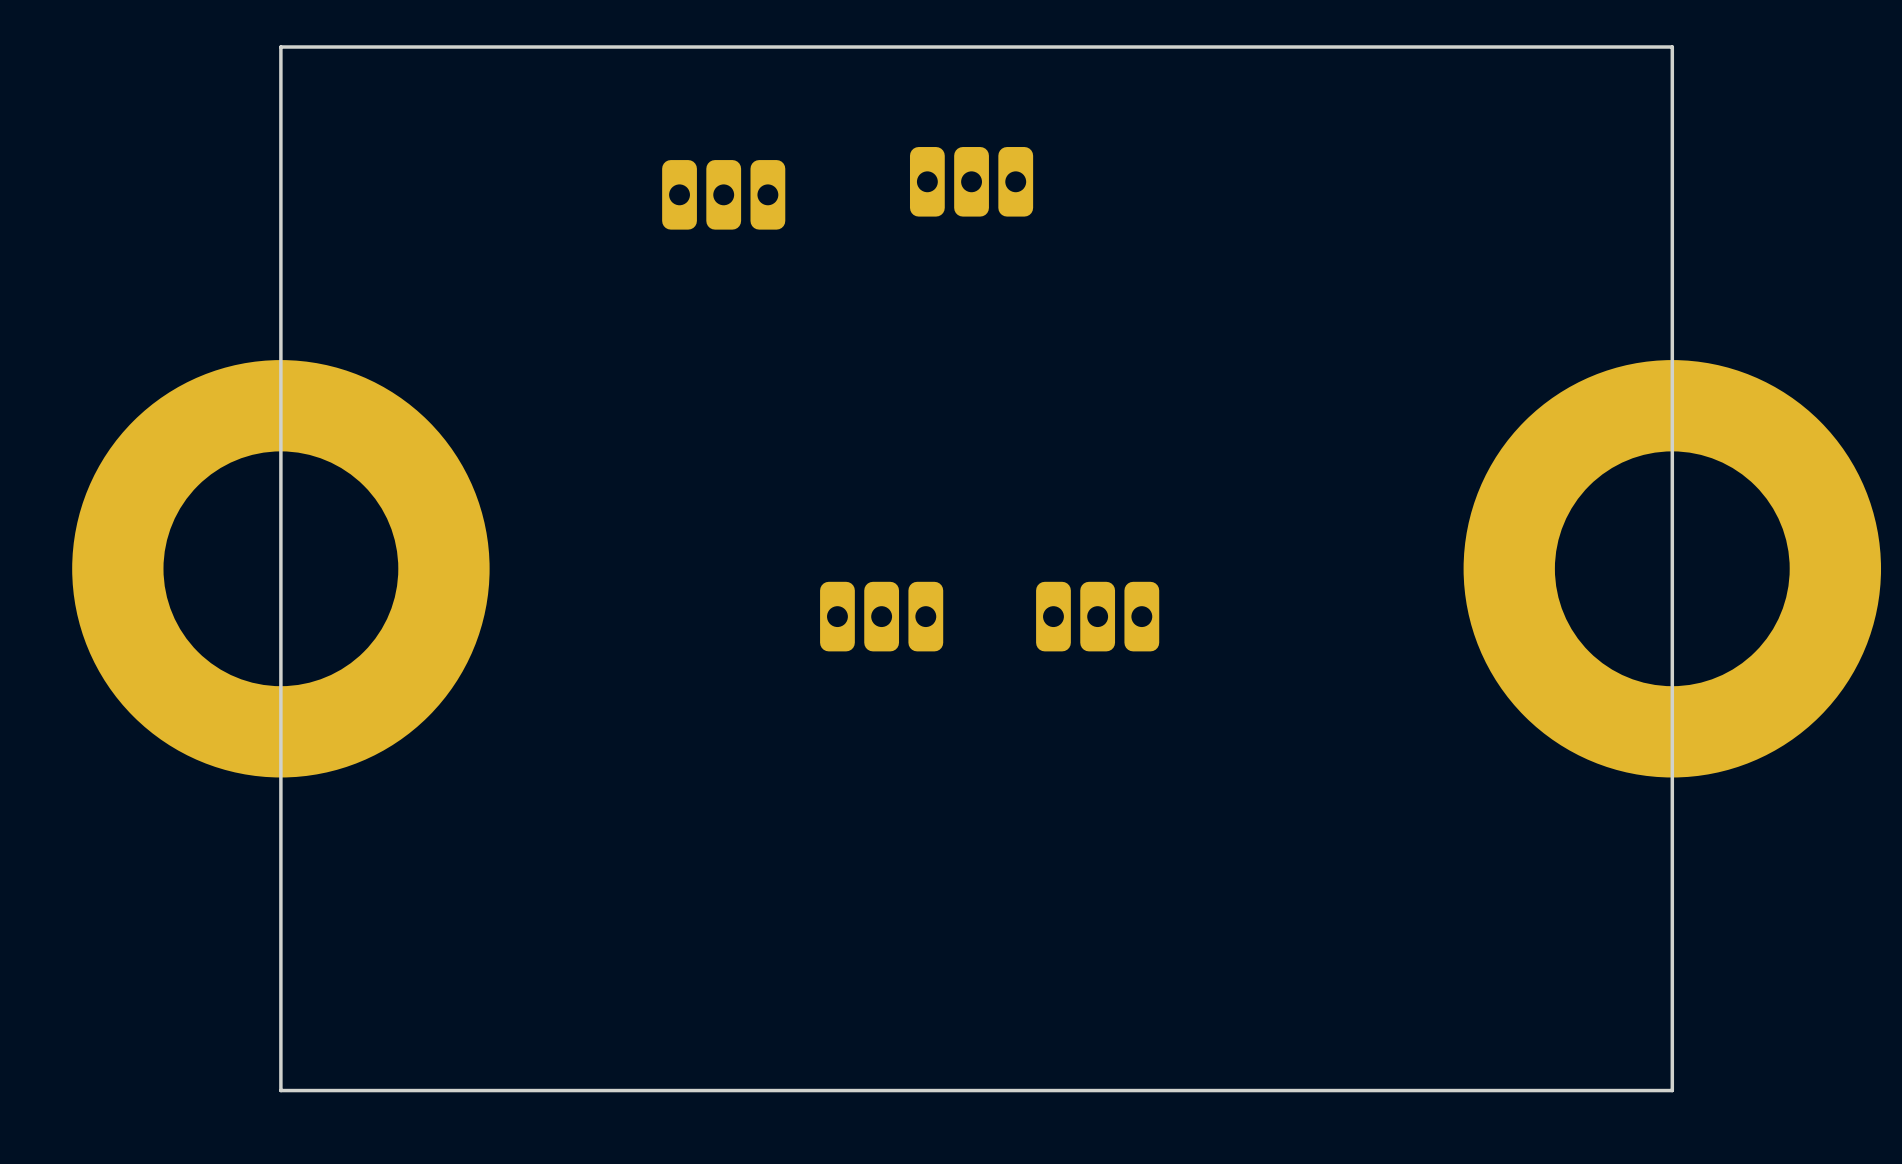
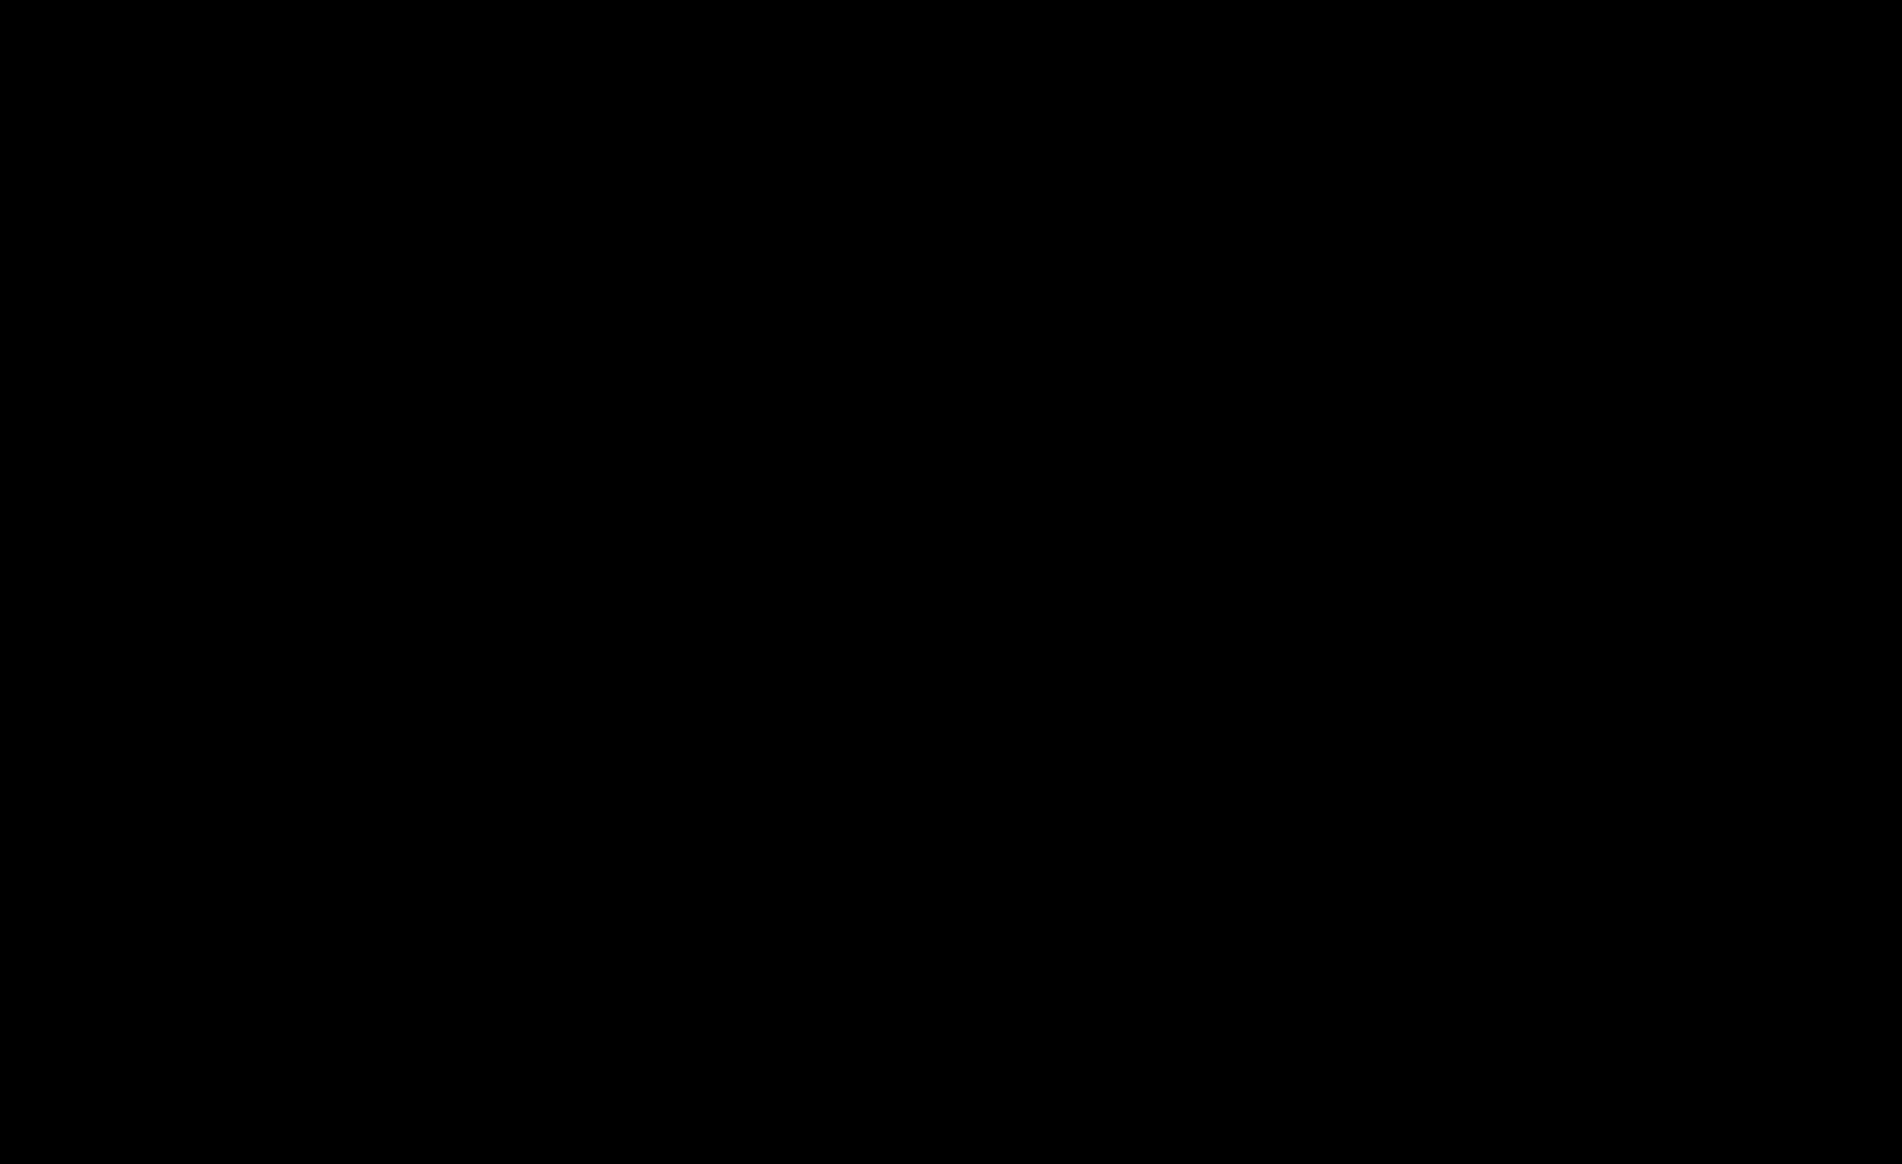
board edge: (1672, 47) (280, 47) (280, 1090) (1672, 1090) (1672, 47) -> none
part: (971, 181) -> none
part: (723, 194) -> none
part: (280, 568) -> none
part: (1672, 568) -> none
part: (881, 616) -> none
part: (1097, 616) -> none

